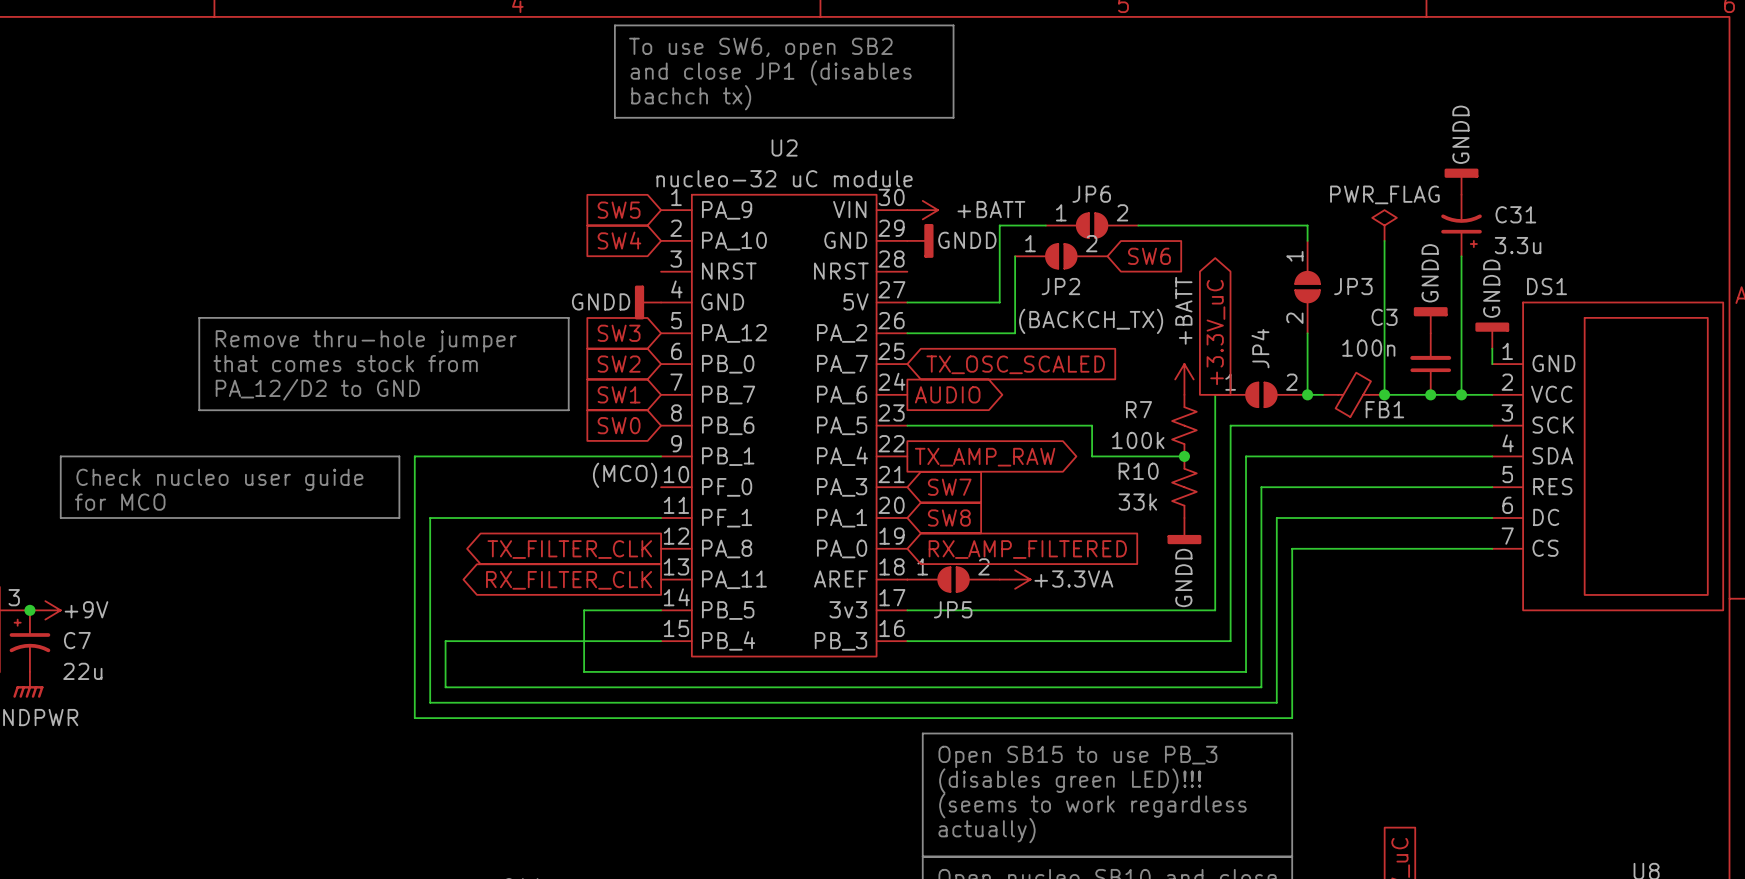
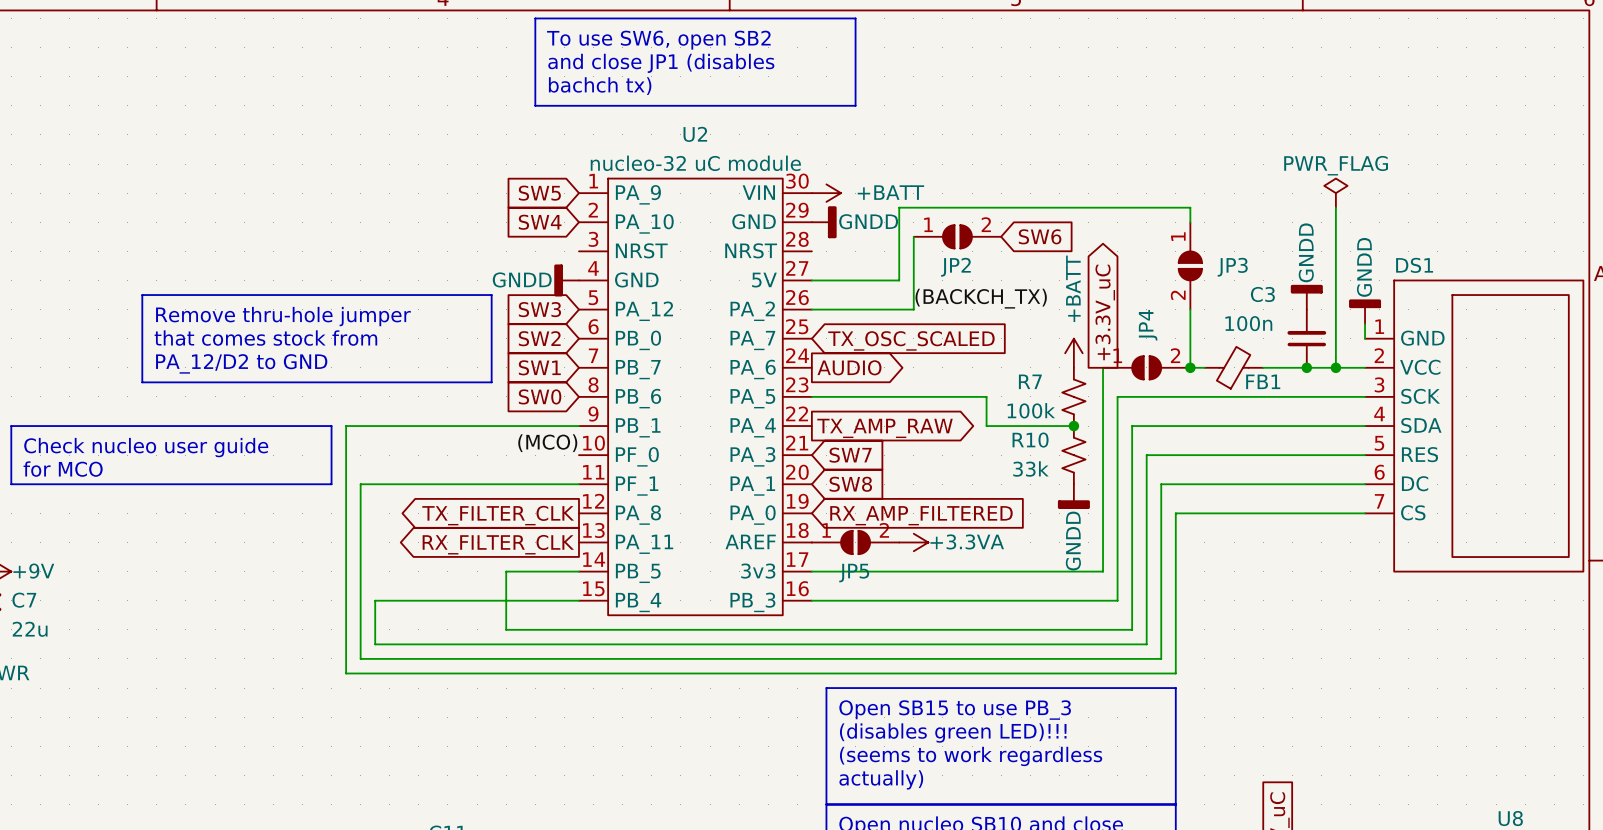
power symbol: GNDD (1461, 181) -> none
JP6: (1092, 225) -> none
power symbol position: PWR_FLAG (1384, 225) -> PWR_FLAG (1335, 193)
C31: 3.3u (1461, 225) -> none
wire: (1384, 240) (1384, 394) -> none
junction: (1384, 394) -> none

